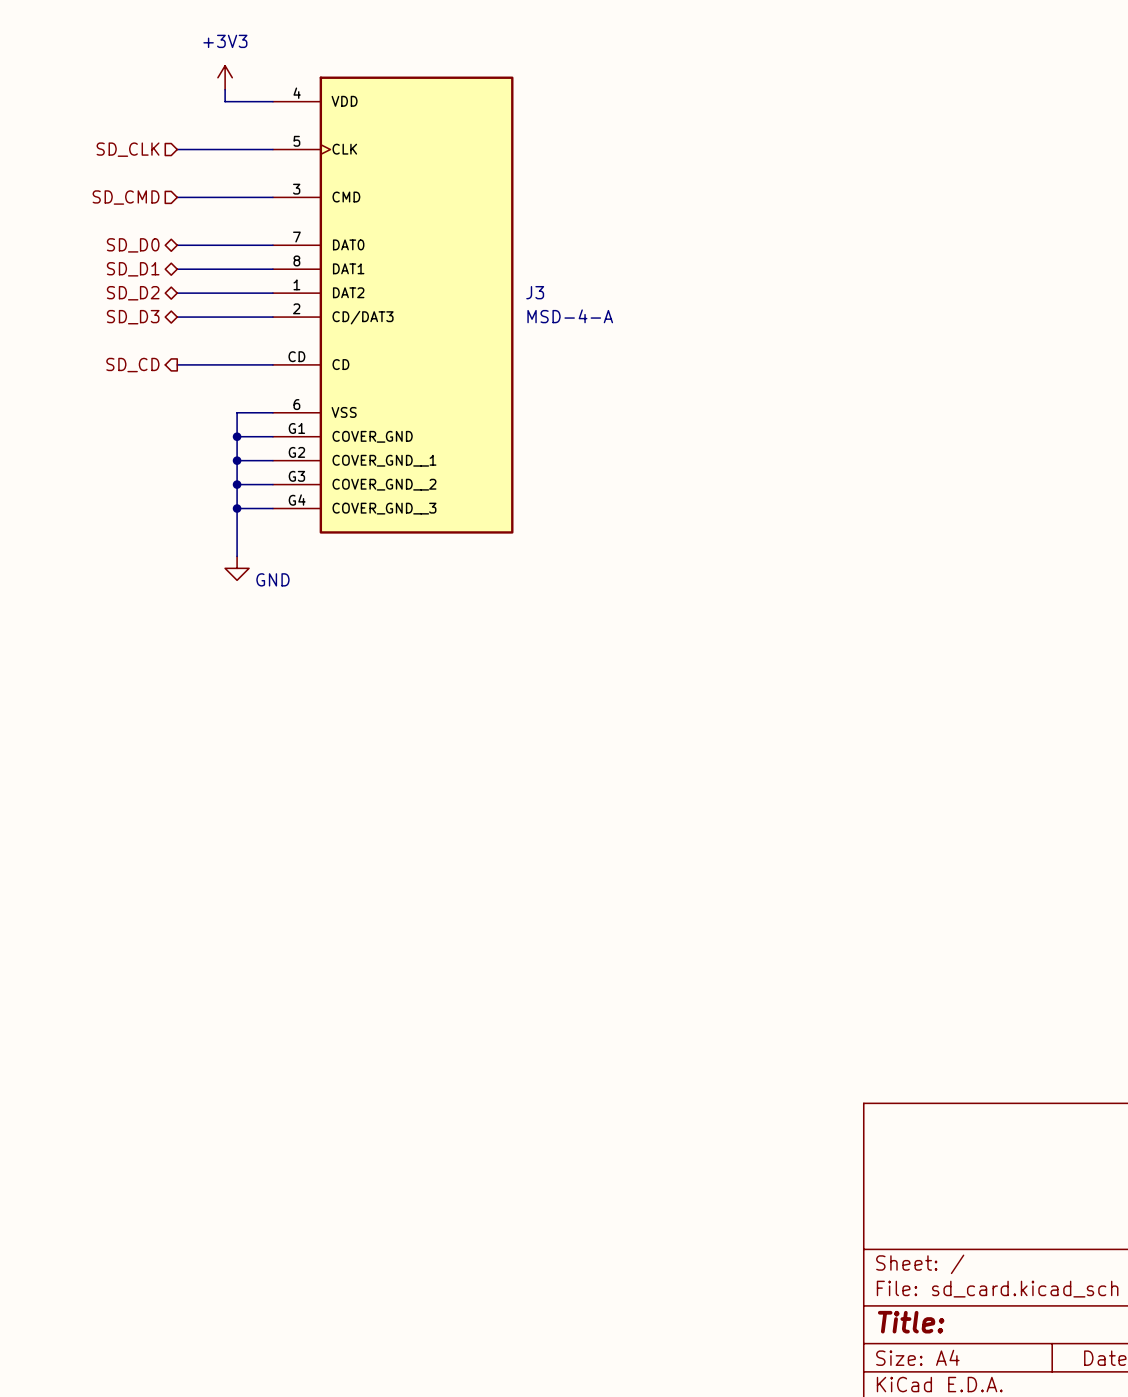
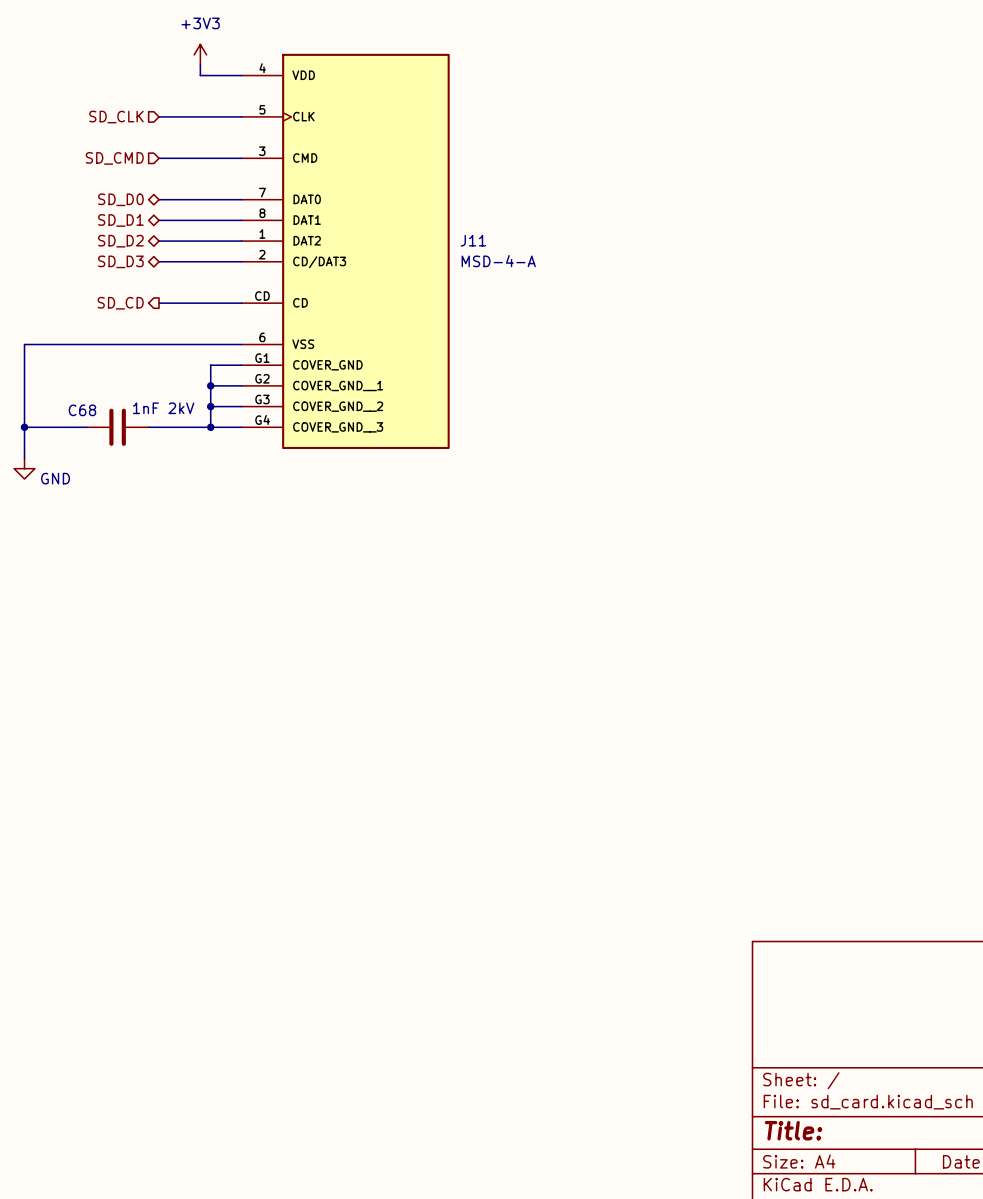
J3 name: J3 (535, 292) -> J11 (473, 240)
wire: (237, 412) (237, 436) -> (210, 344) (24, 344) (24, 458)
junction: (237, 436) -> none
wire: none -> (24, 427) (86, 427)
junction: none -> (24, 427)
C68: none -> 1nF 2kV (117, 427)
wire: (237, 508) (237, 556) -> (210, 427) (148, 427)
power symbol position: GND (237, 568) -> GND (24, 468)

